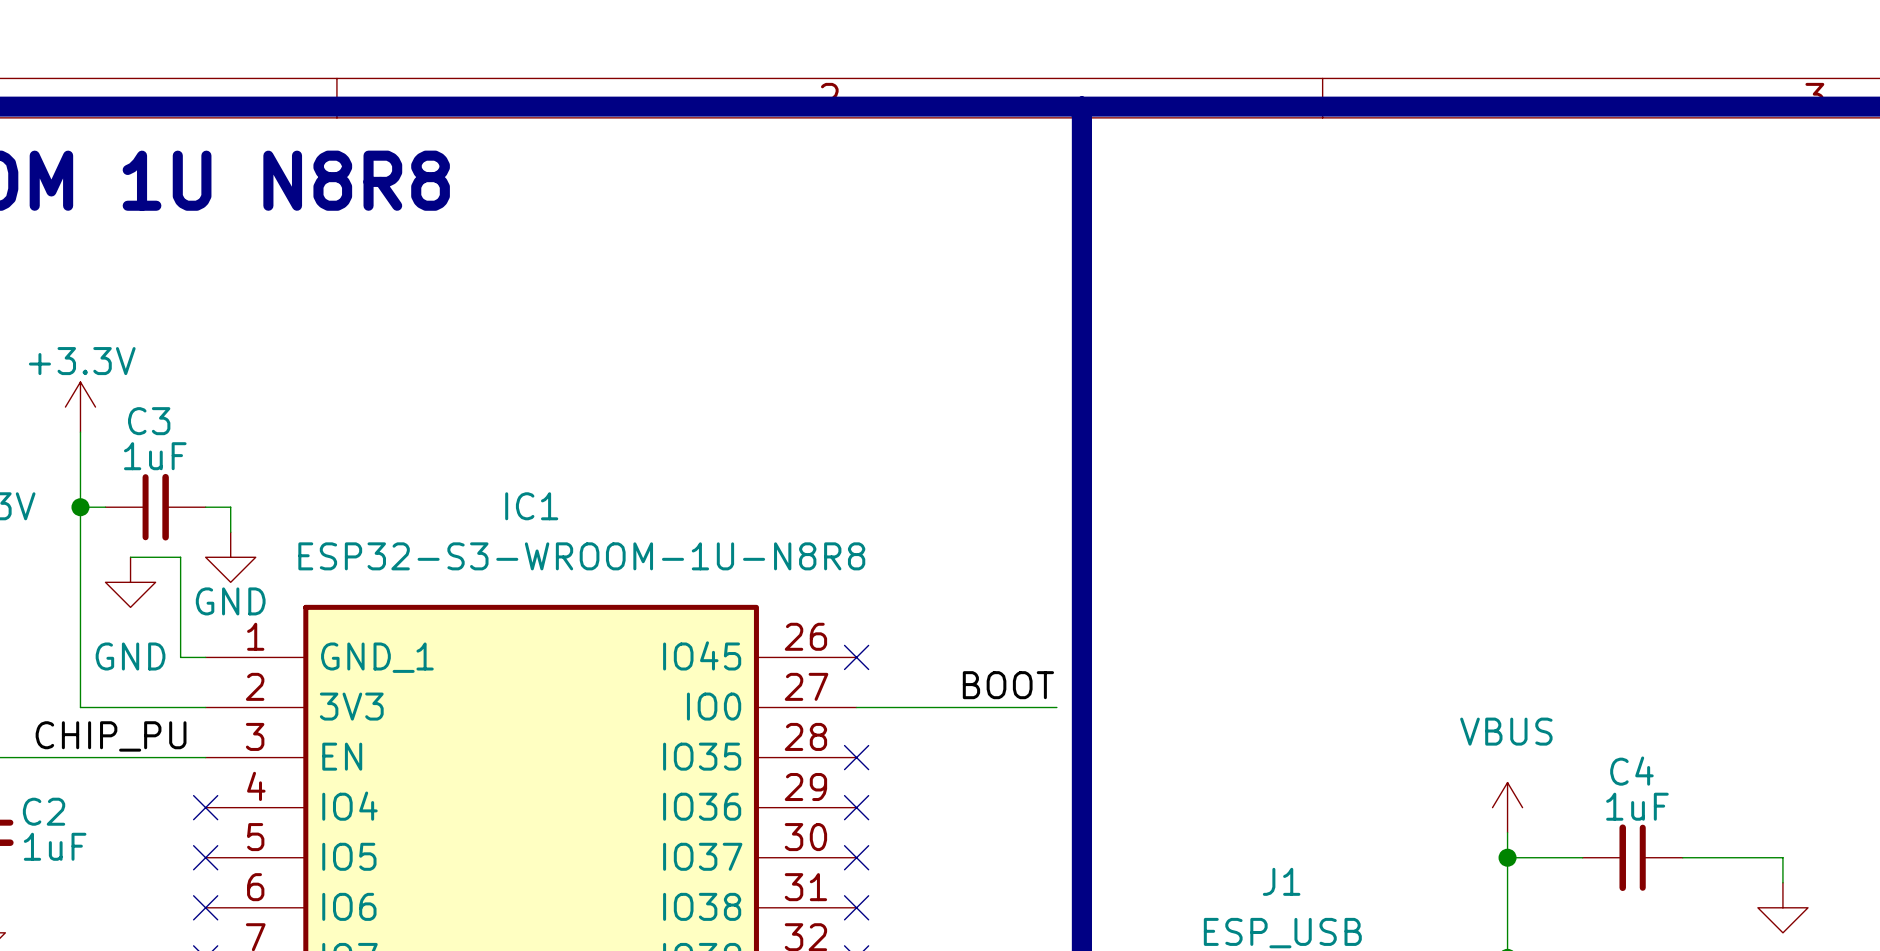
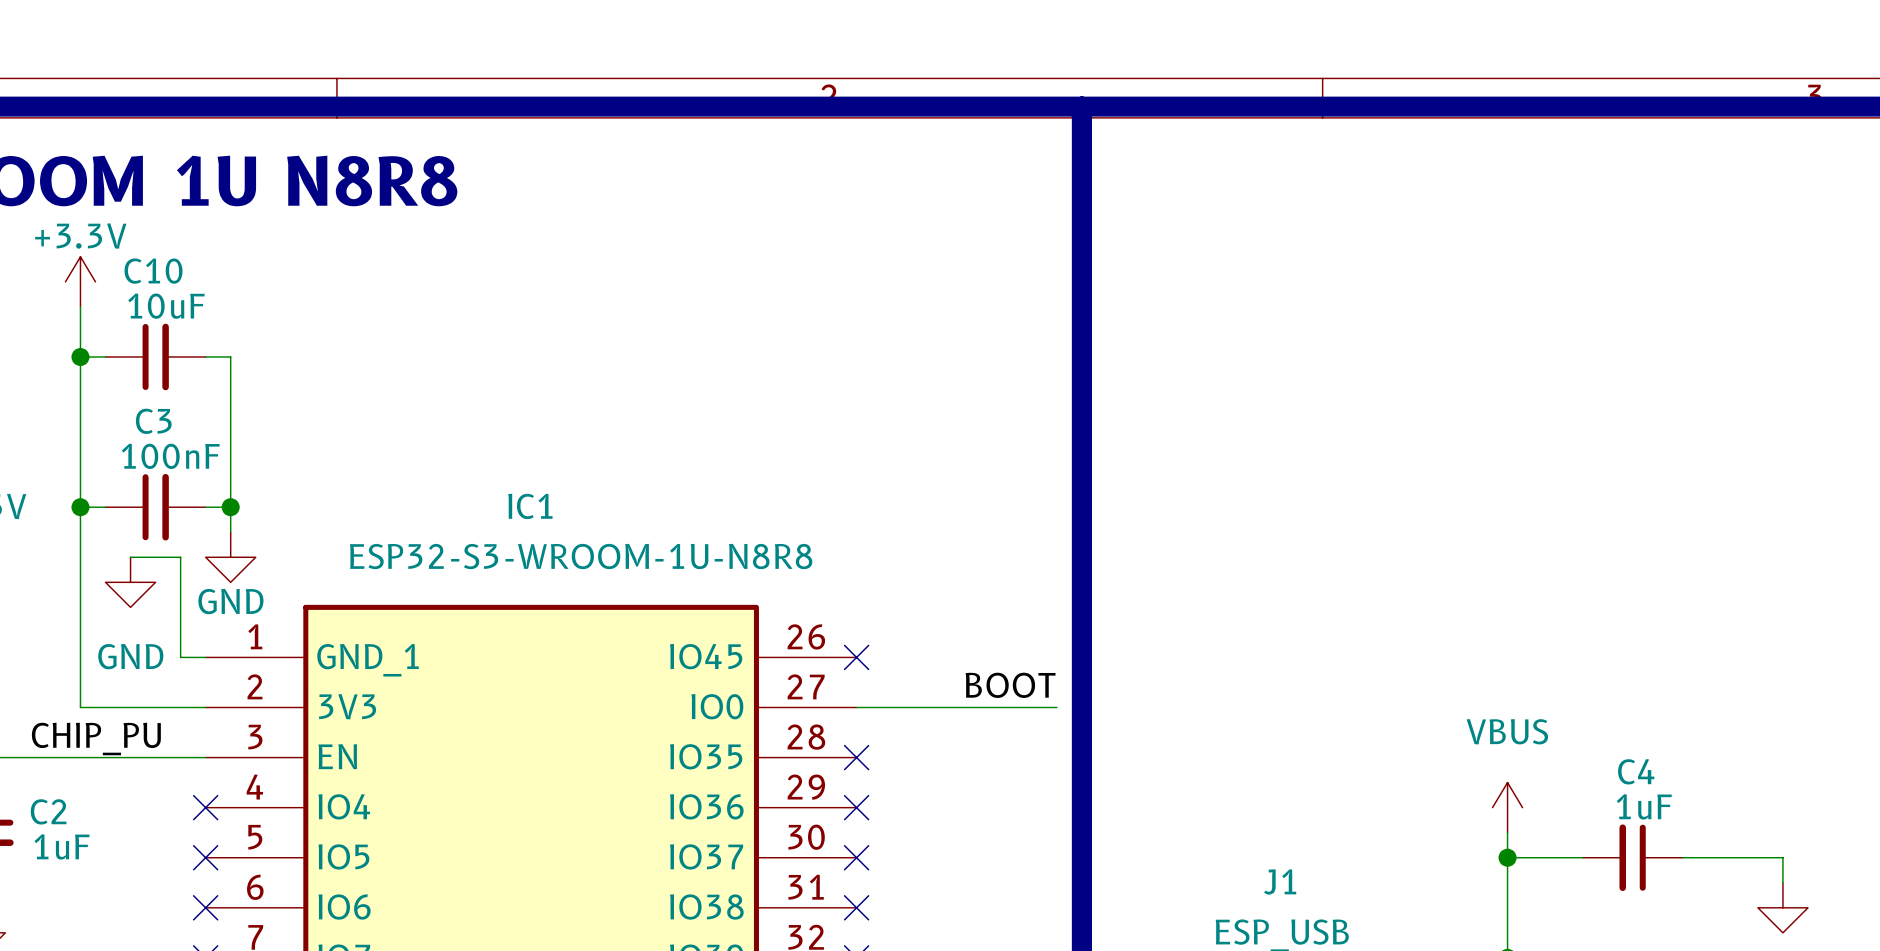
wire: none -> (80, 306) (80, 432)
wire: none -> (80, 357) (105, 357)
junction: none -> (80, 357)
C10: none -> 10uF (155, 357)
wire: none -> (205, 357) (230, 357) (230, 507)
power symbol position: +3.3V (80, 407) -> +3.3V (80, 281)
C3 value: 1uF (155, 456) -> 100nF (170, 456)
junction: none -> (230, 507)

